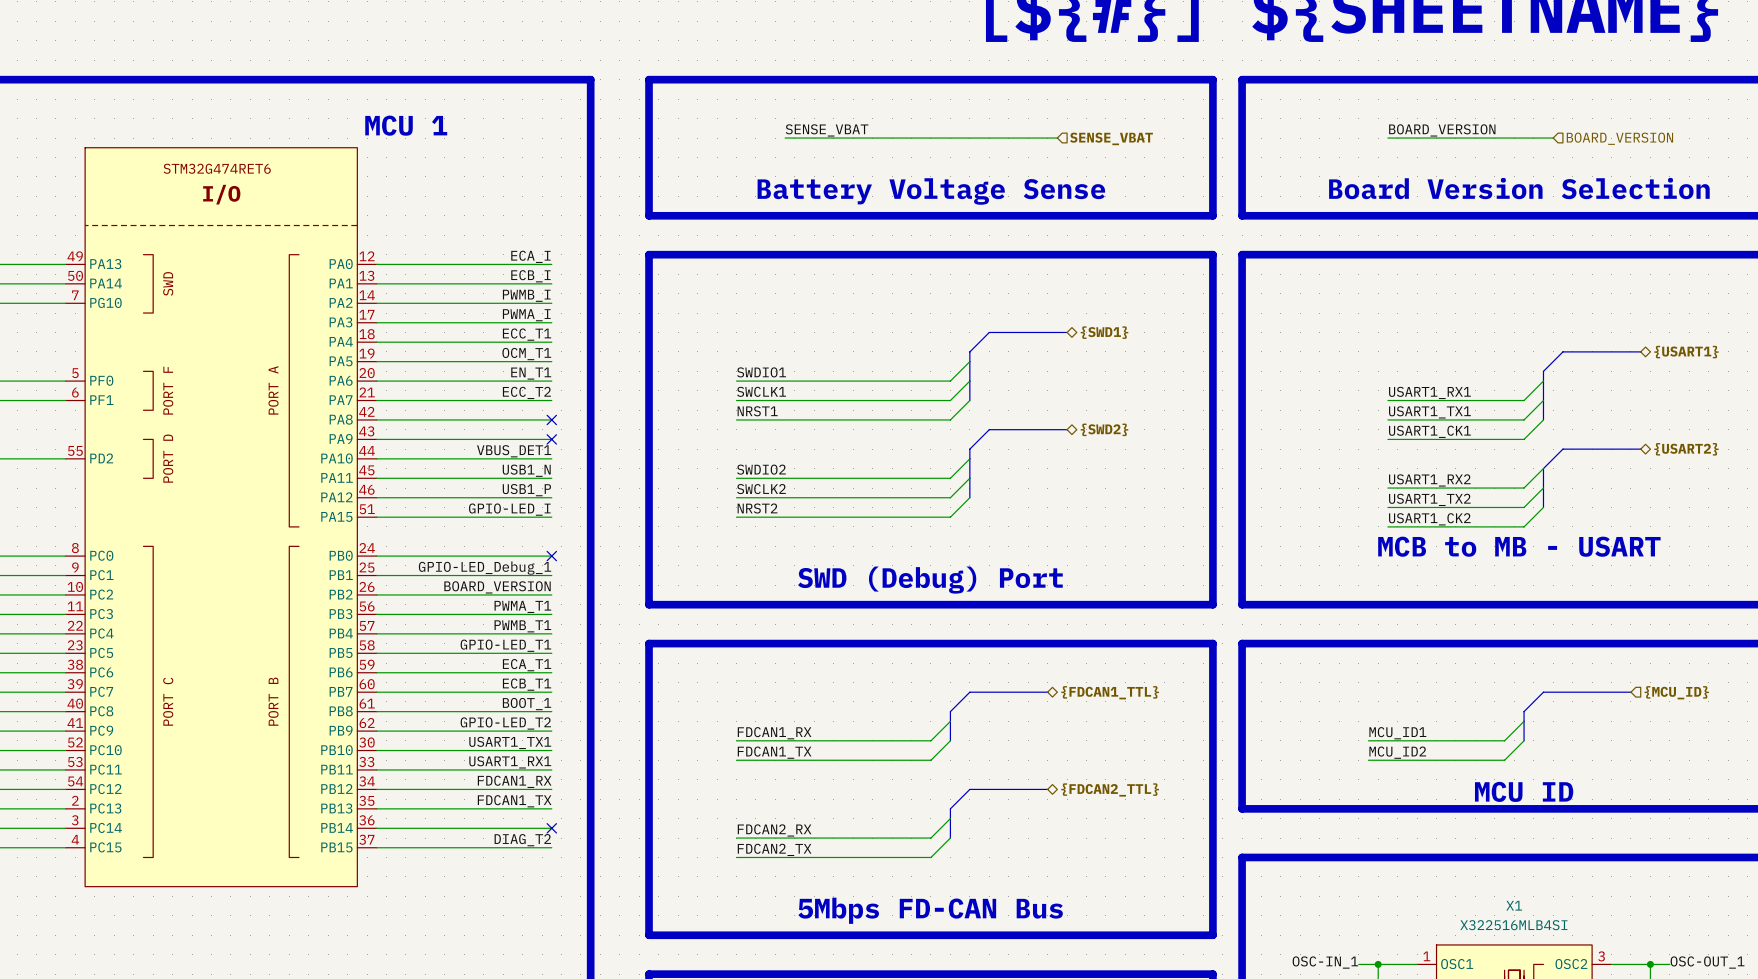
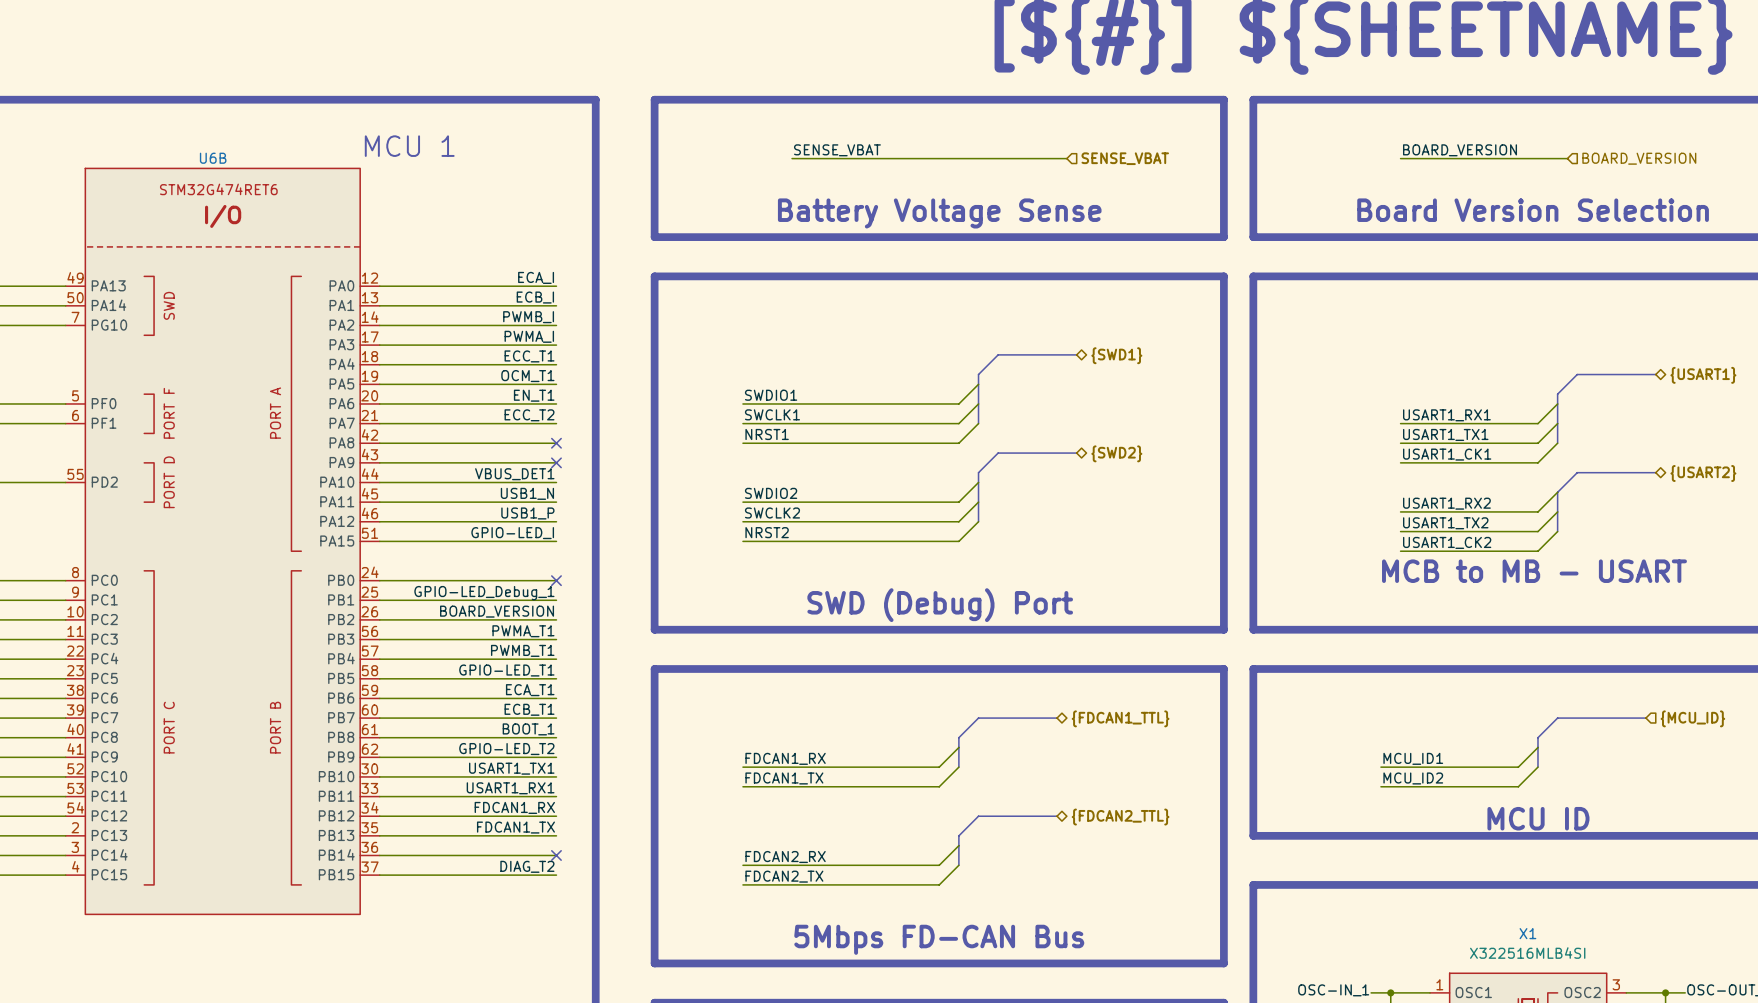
U6B name: none -> U6B (213, 158)

